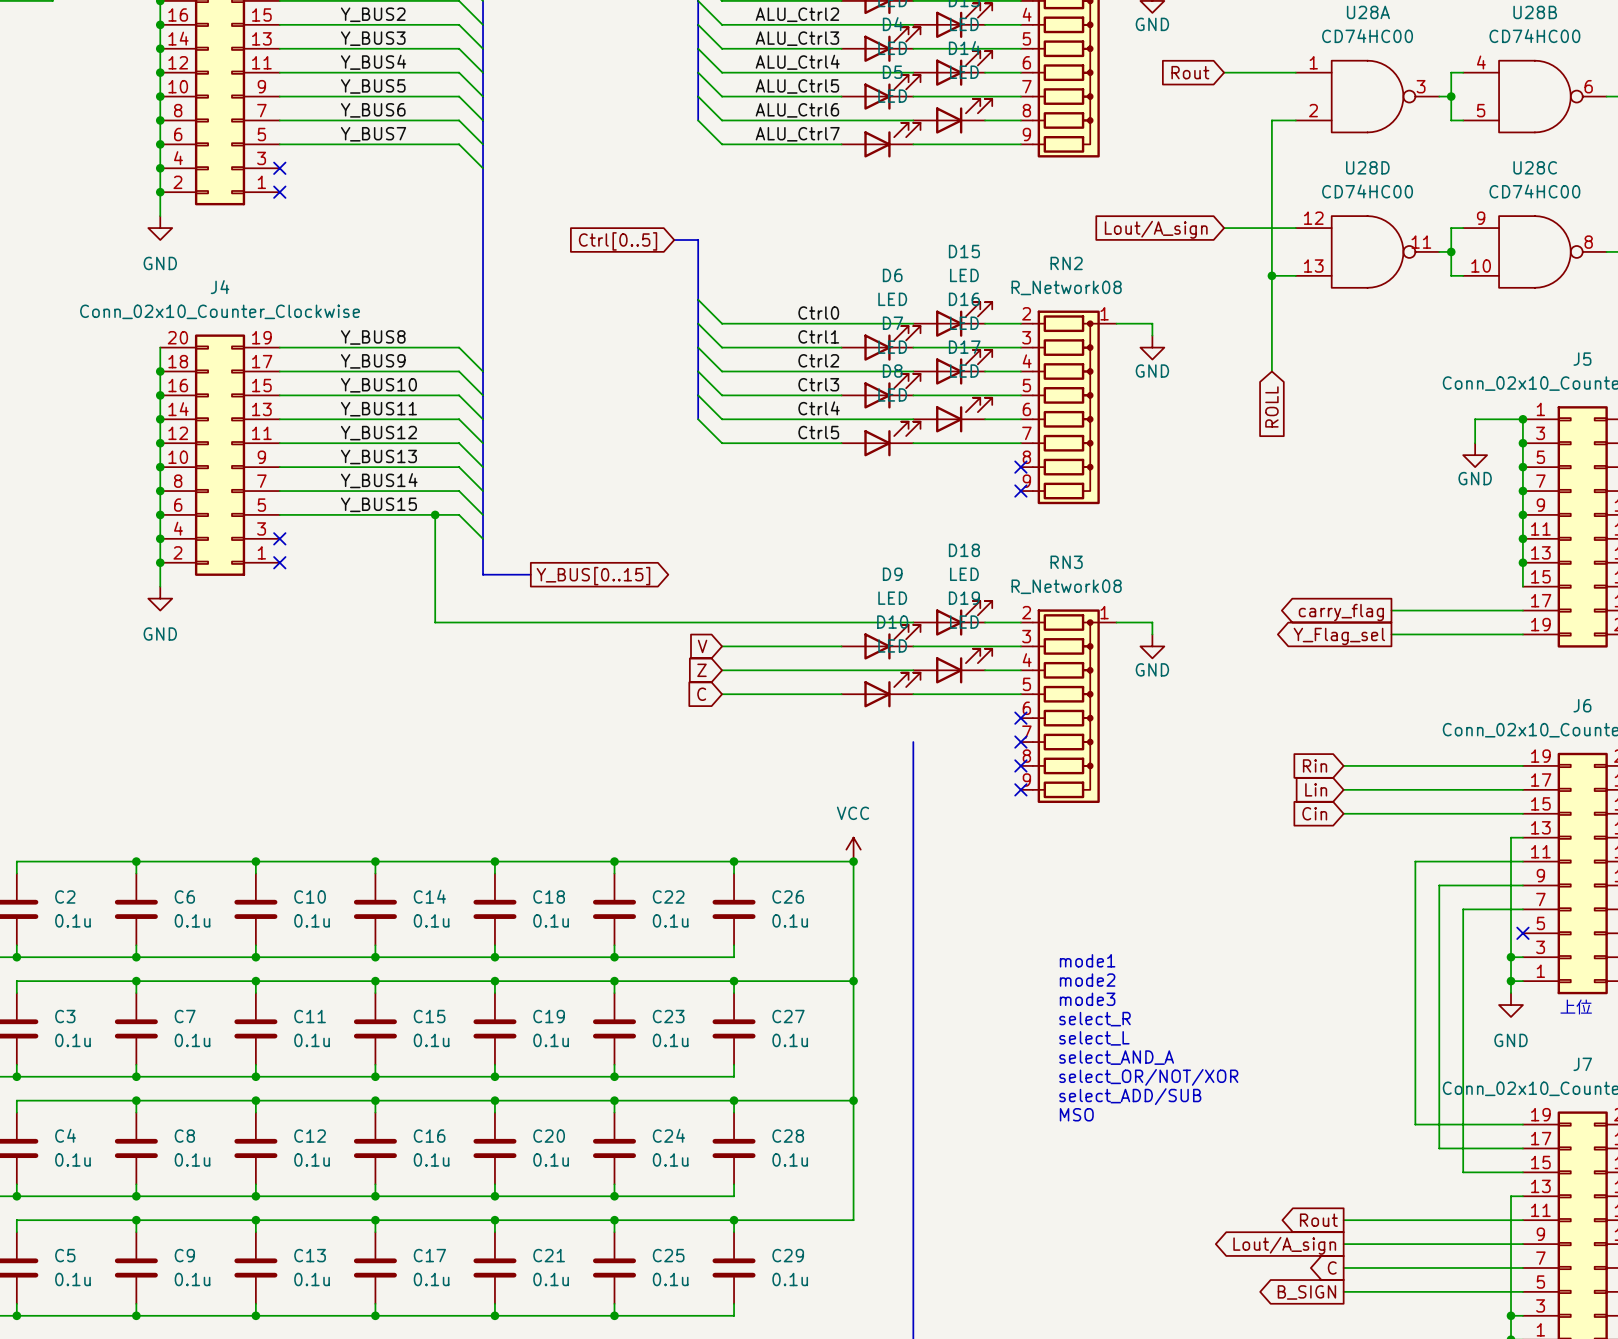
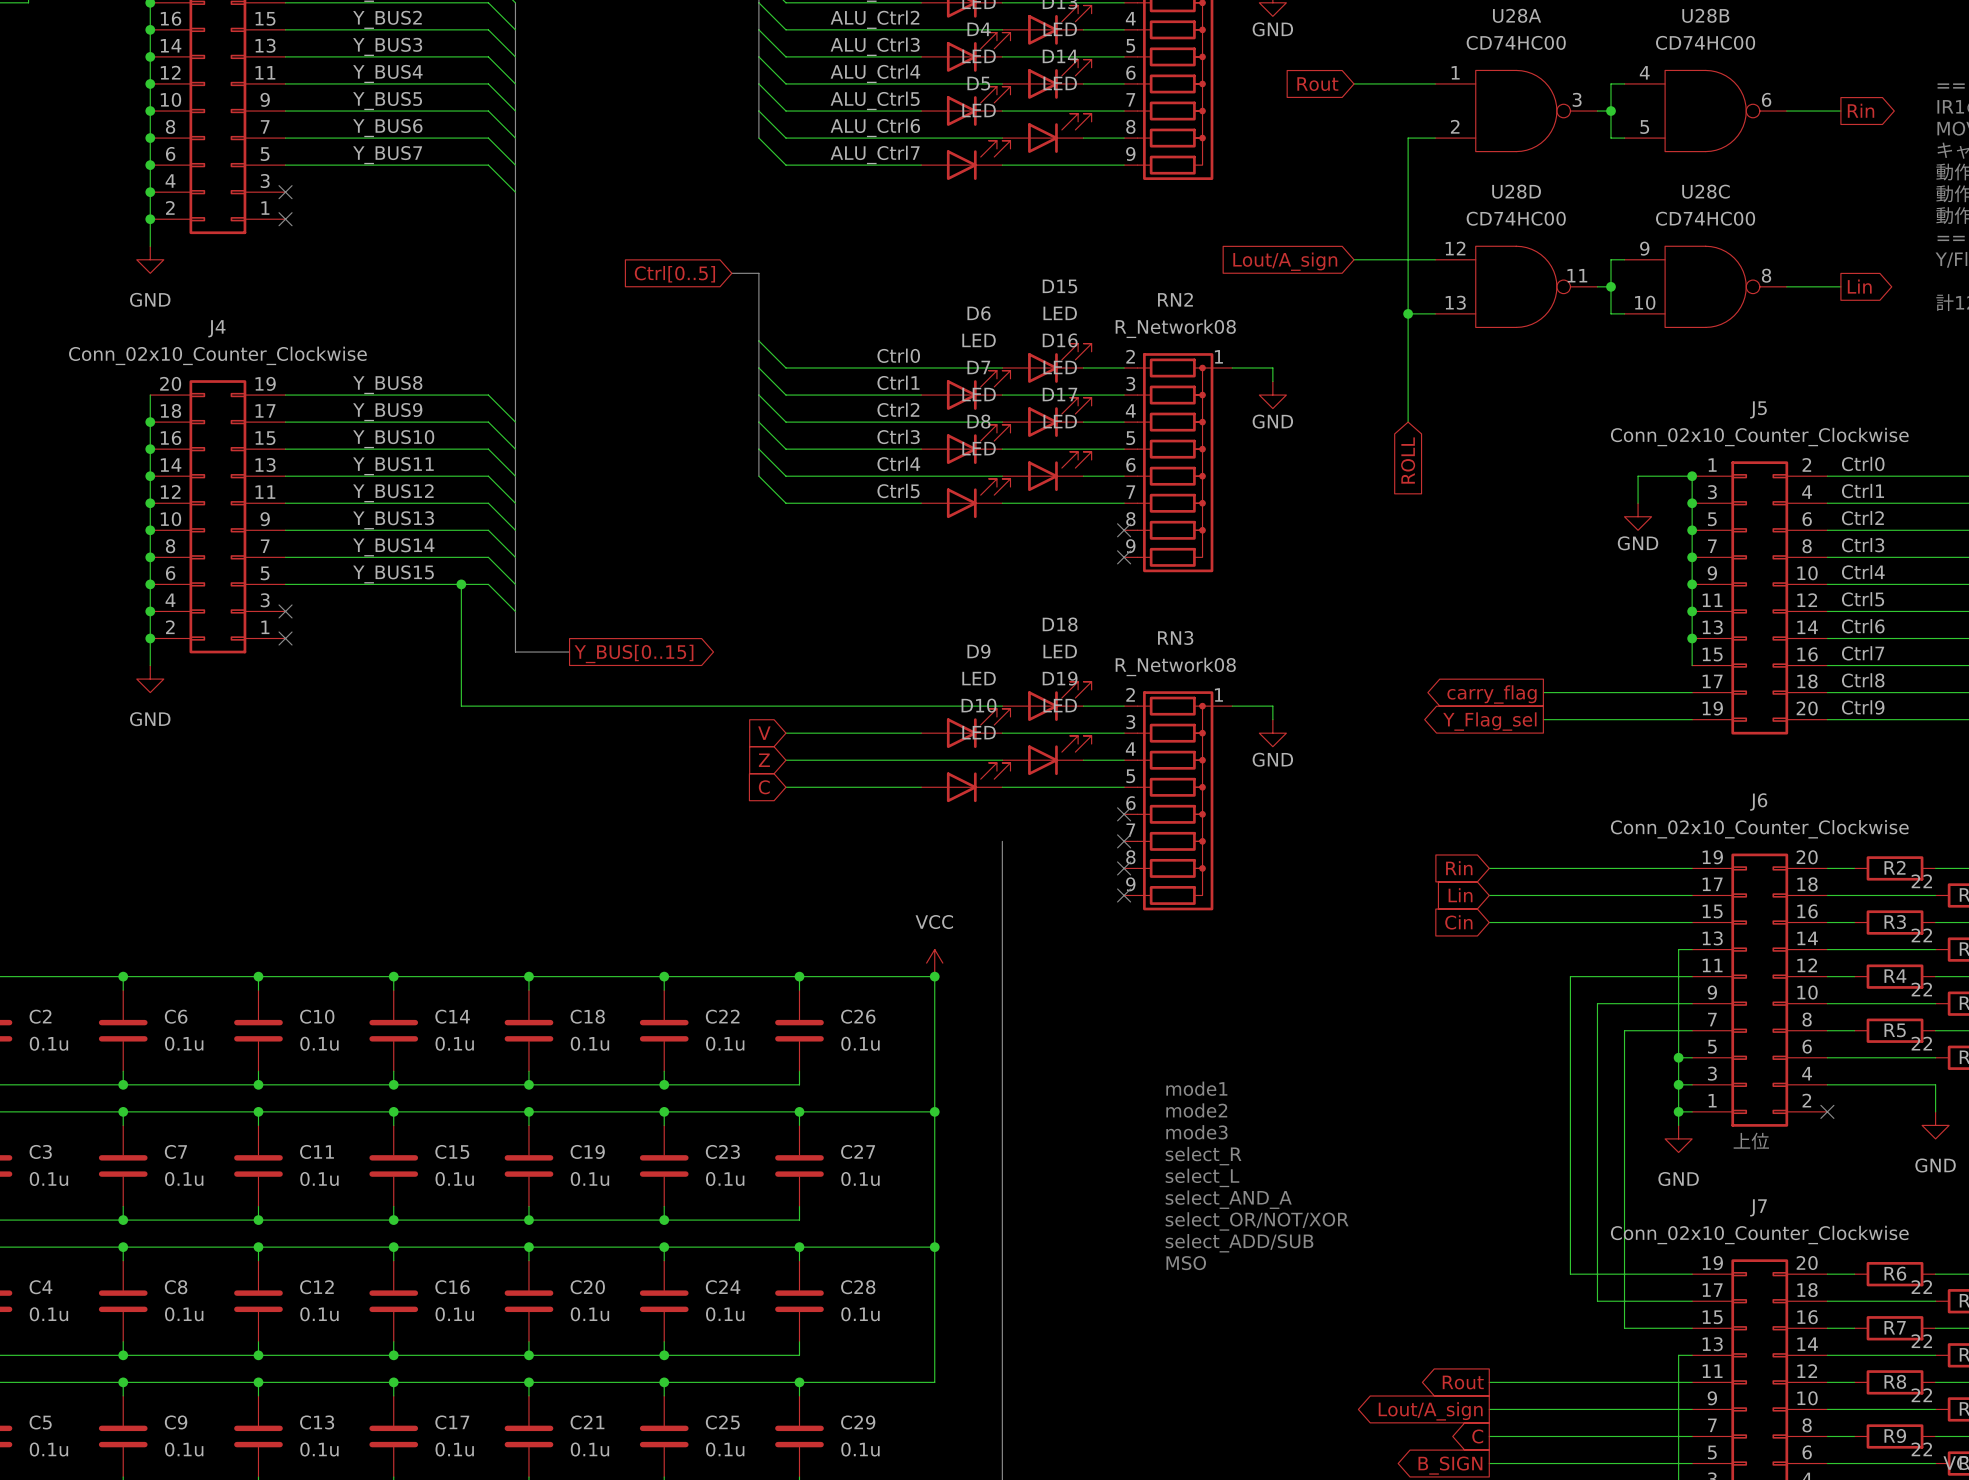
wire: none -> (1678, 1057) (1692, 1057)
junction: none -> (1678, 1057)
no-connect mark: (1522, 933) -> none

